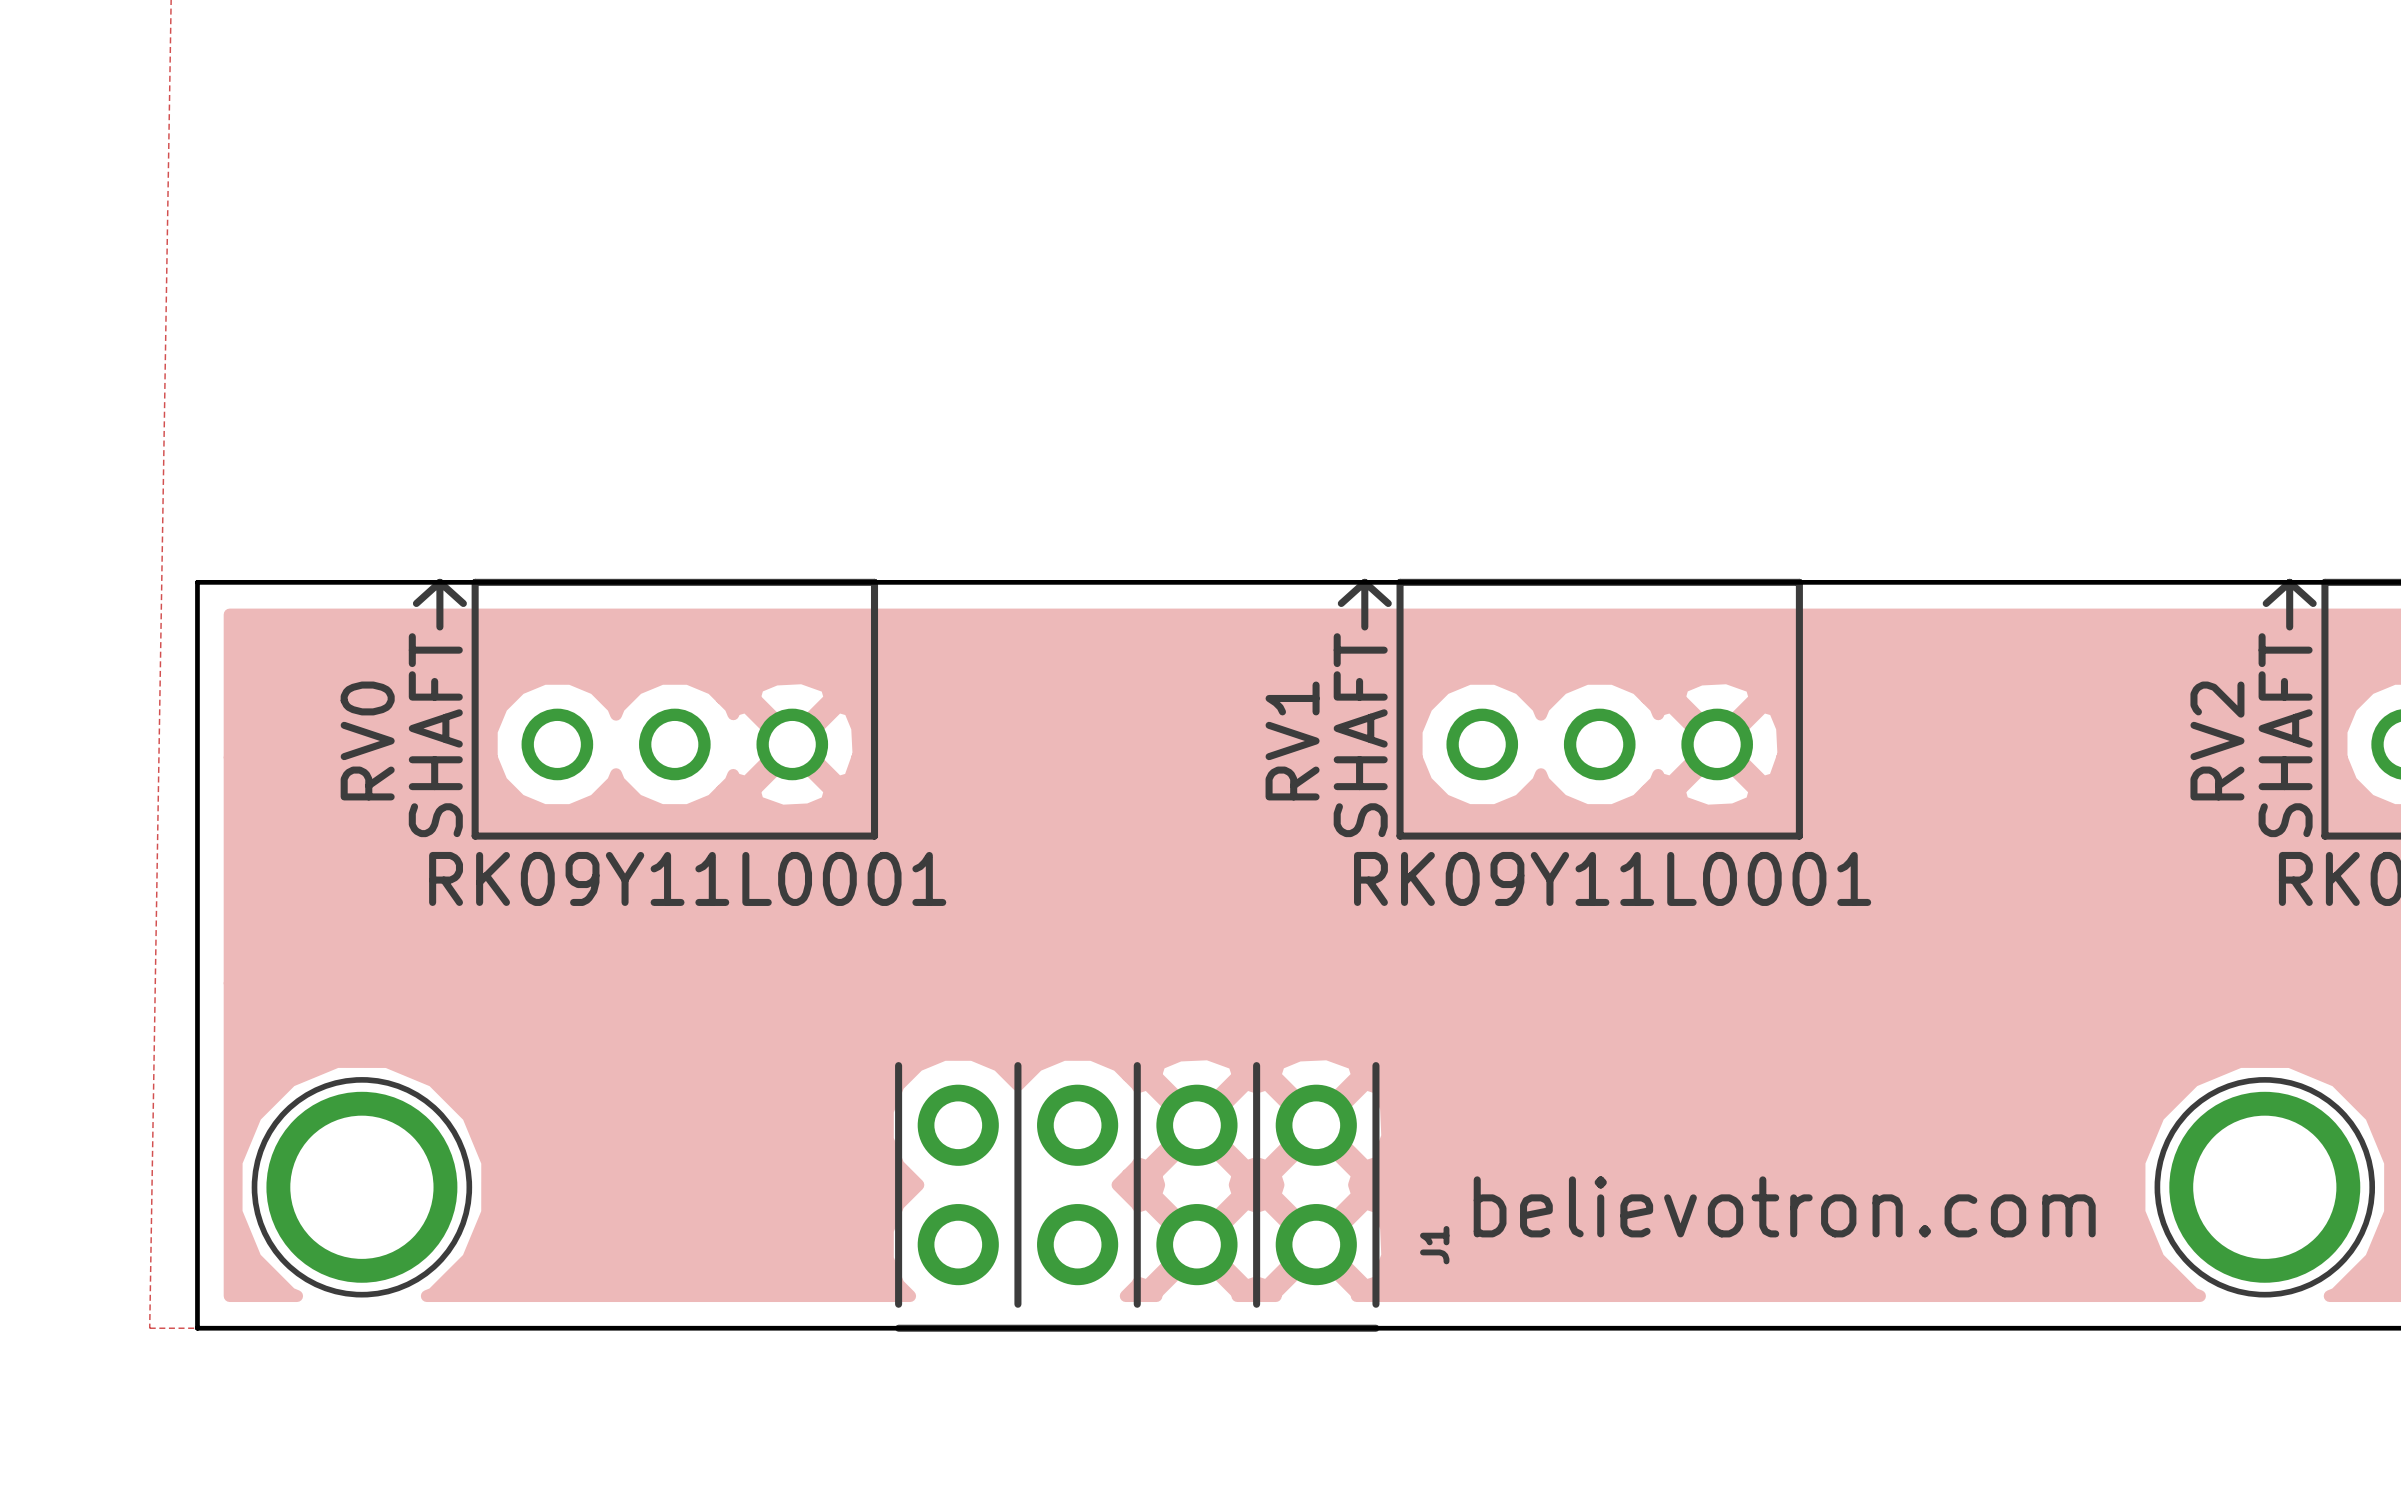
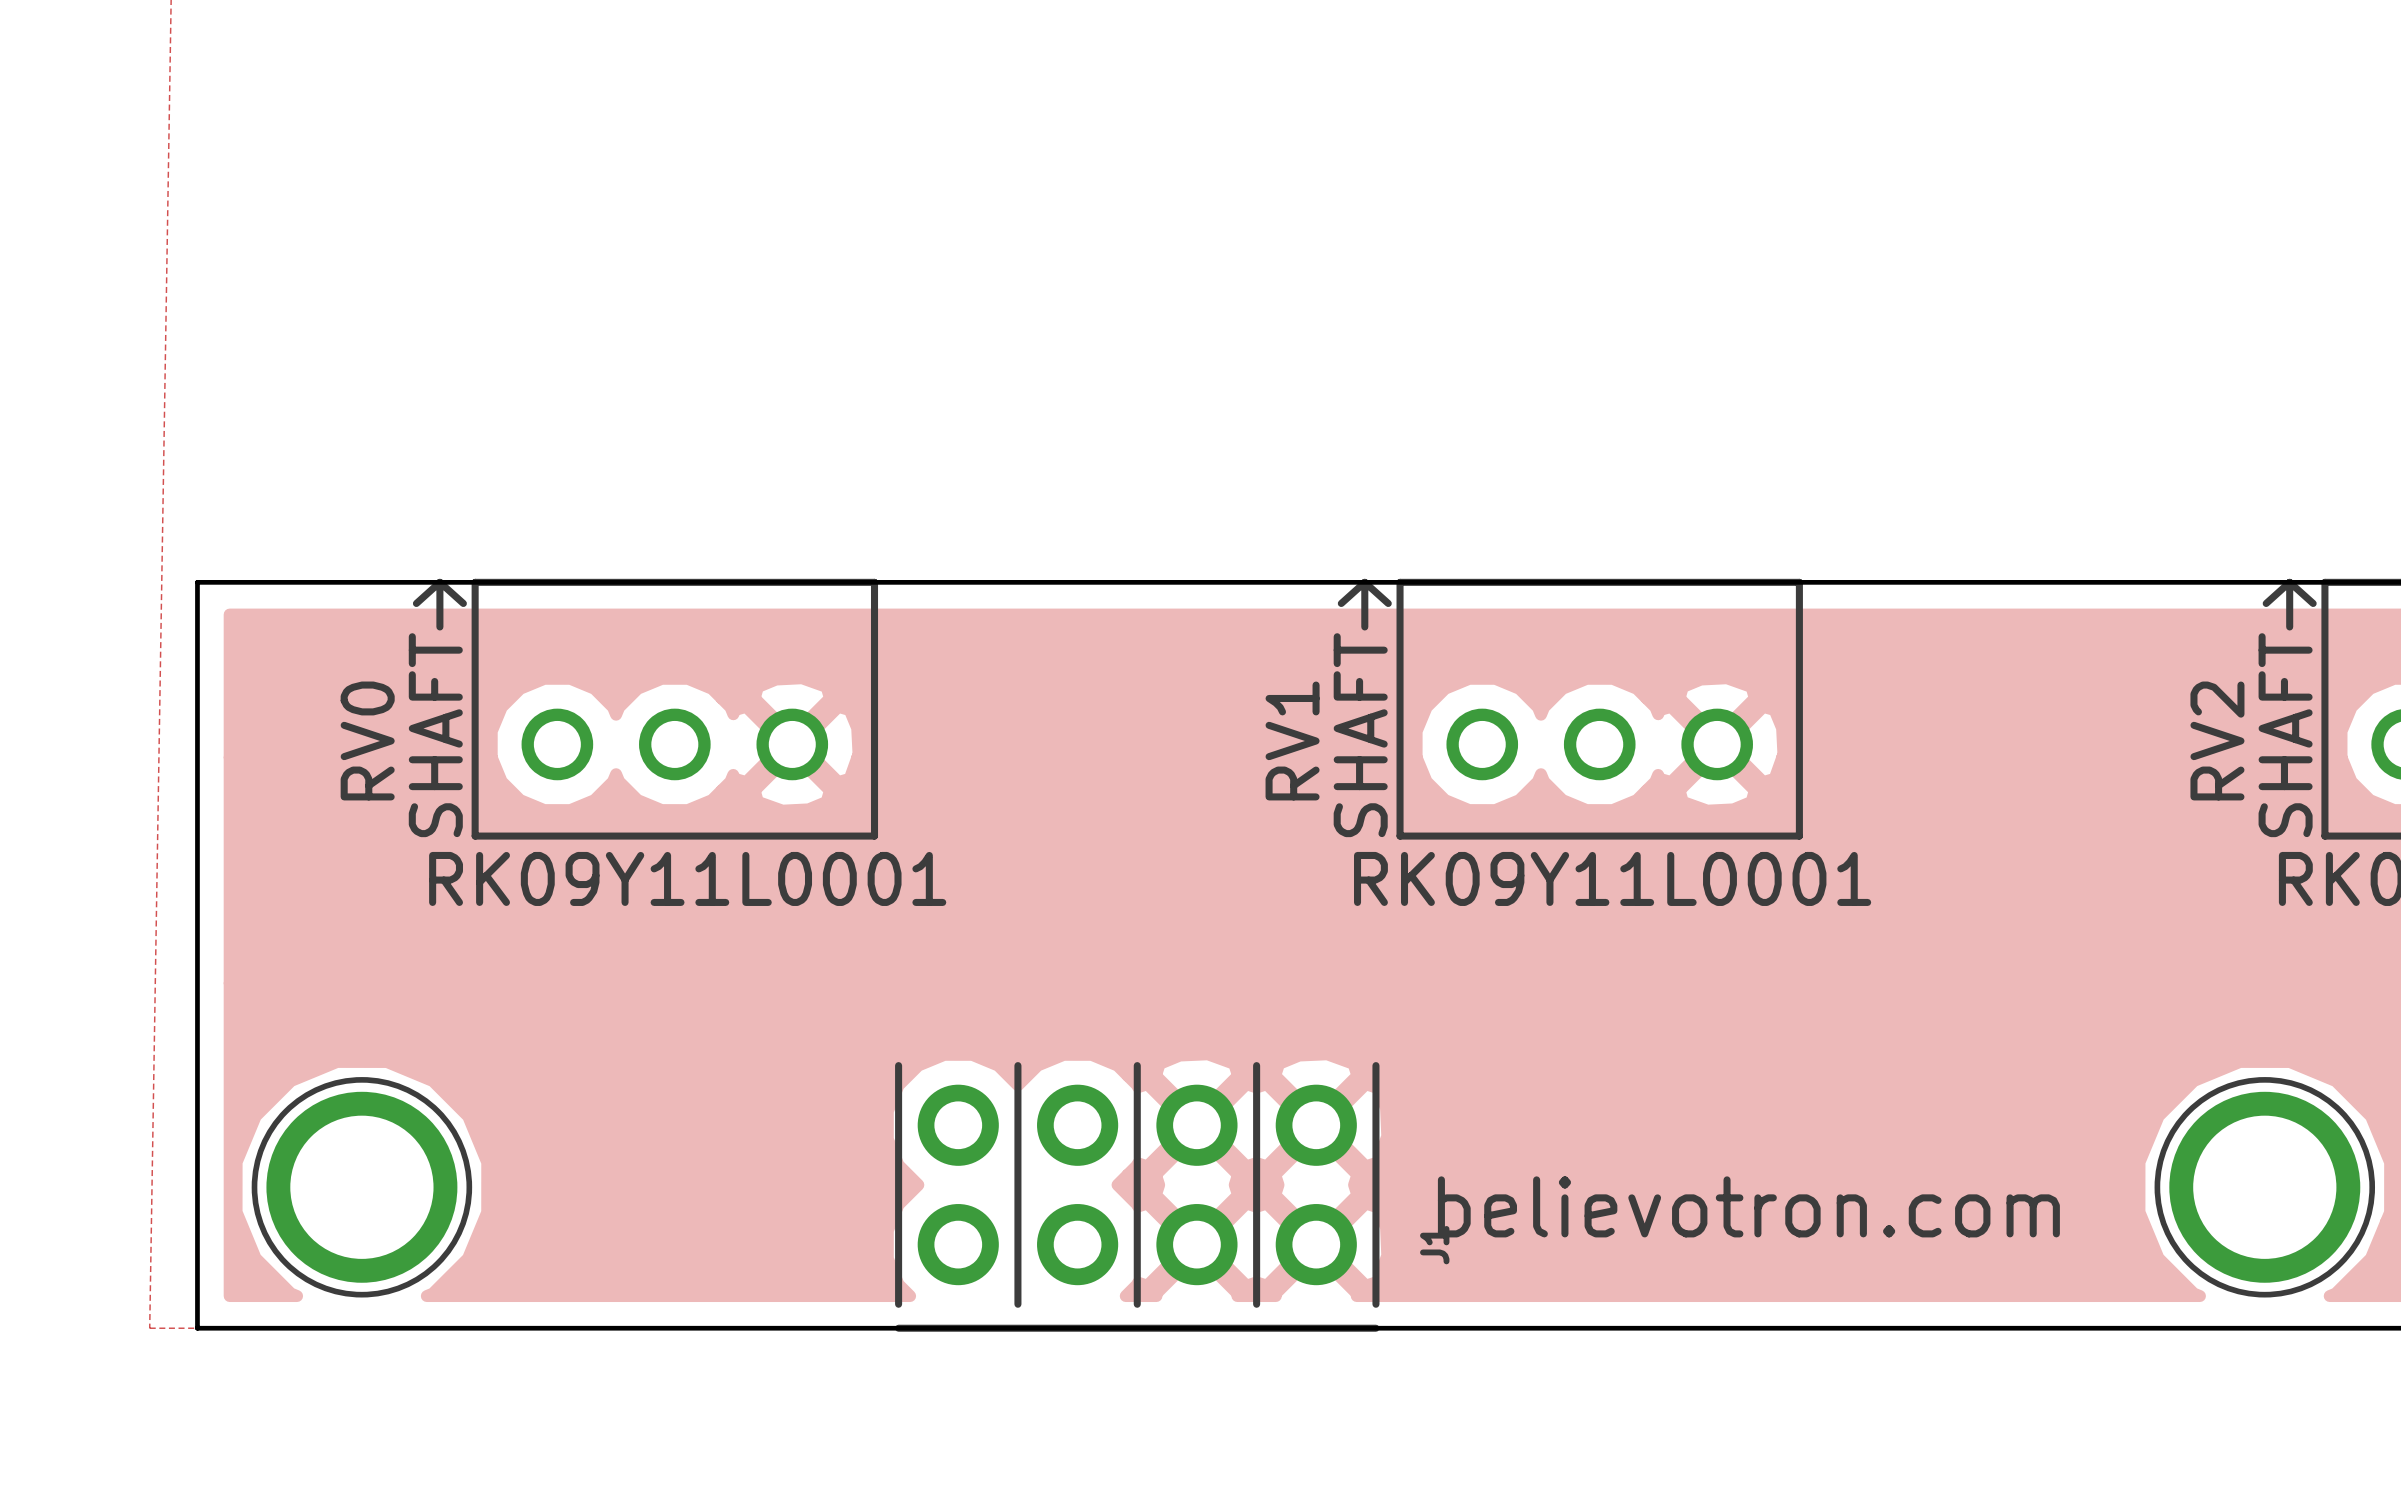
text position: believotron.com (1784, 1206) -> believotron.com (1748, 1206)

